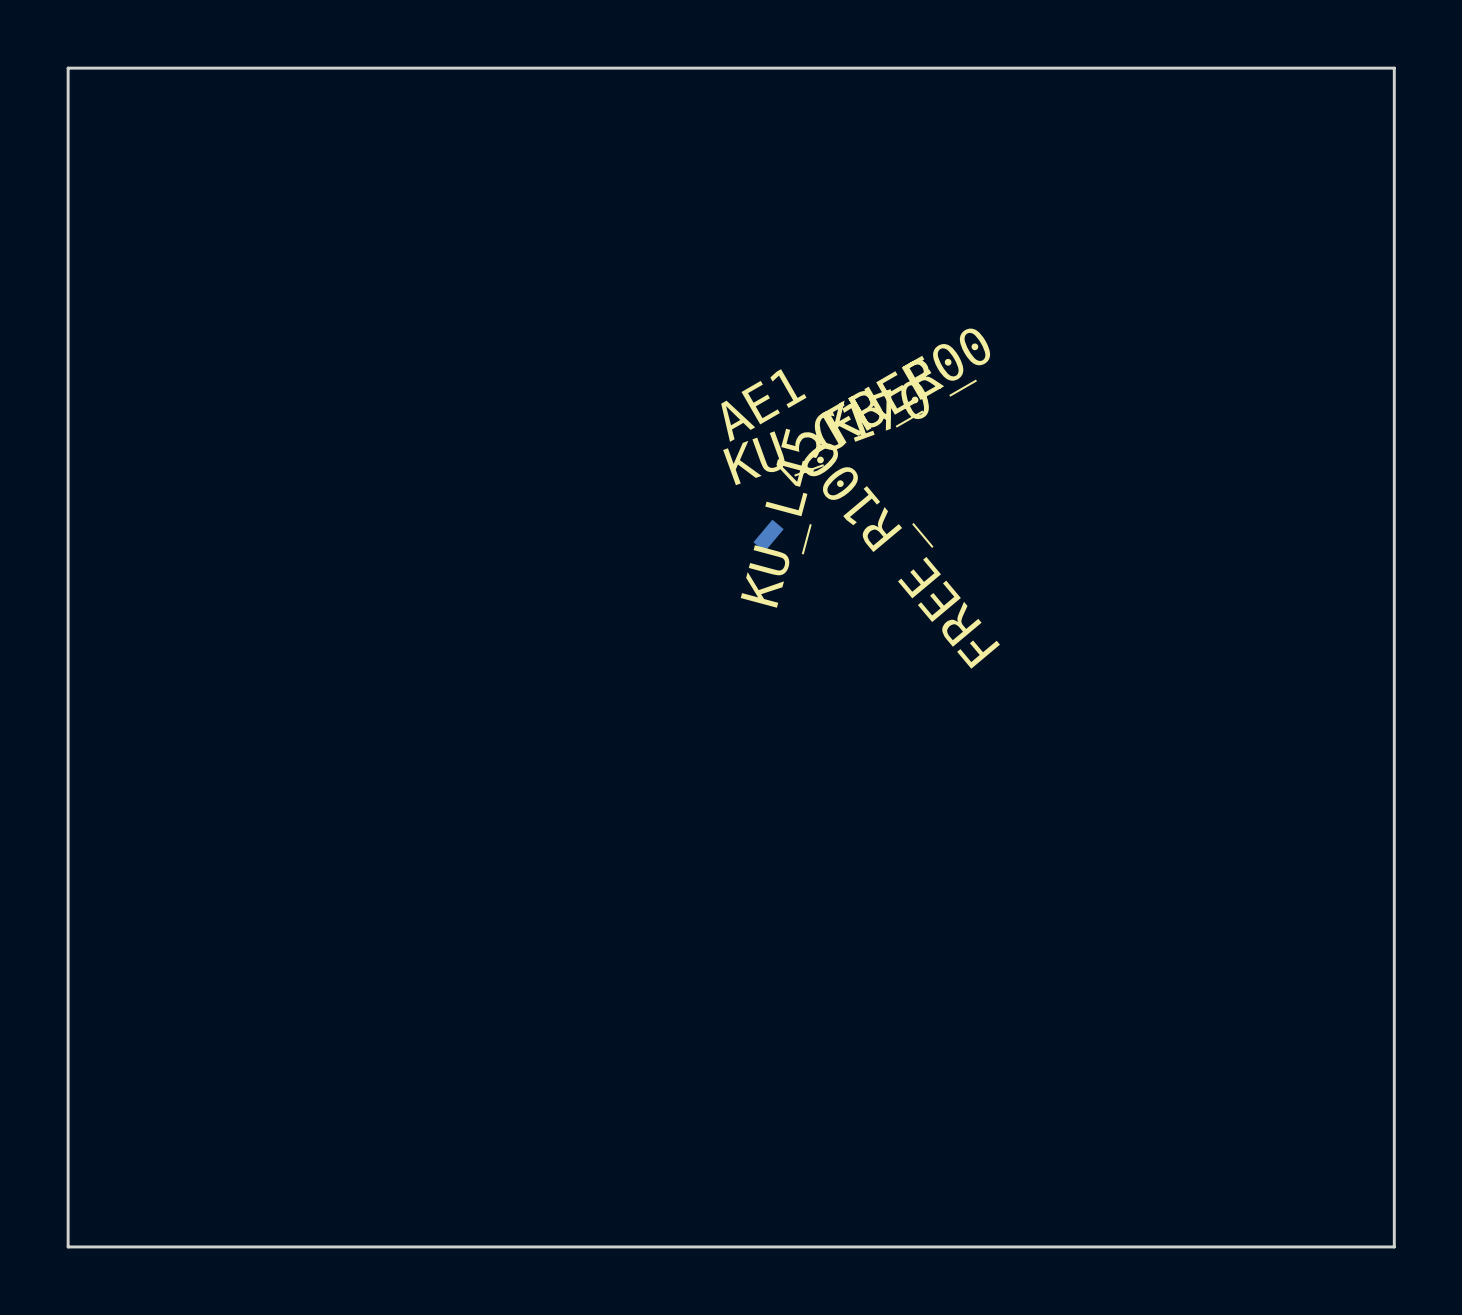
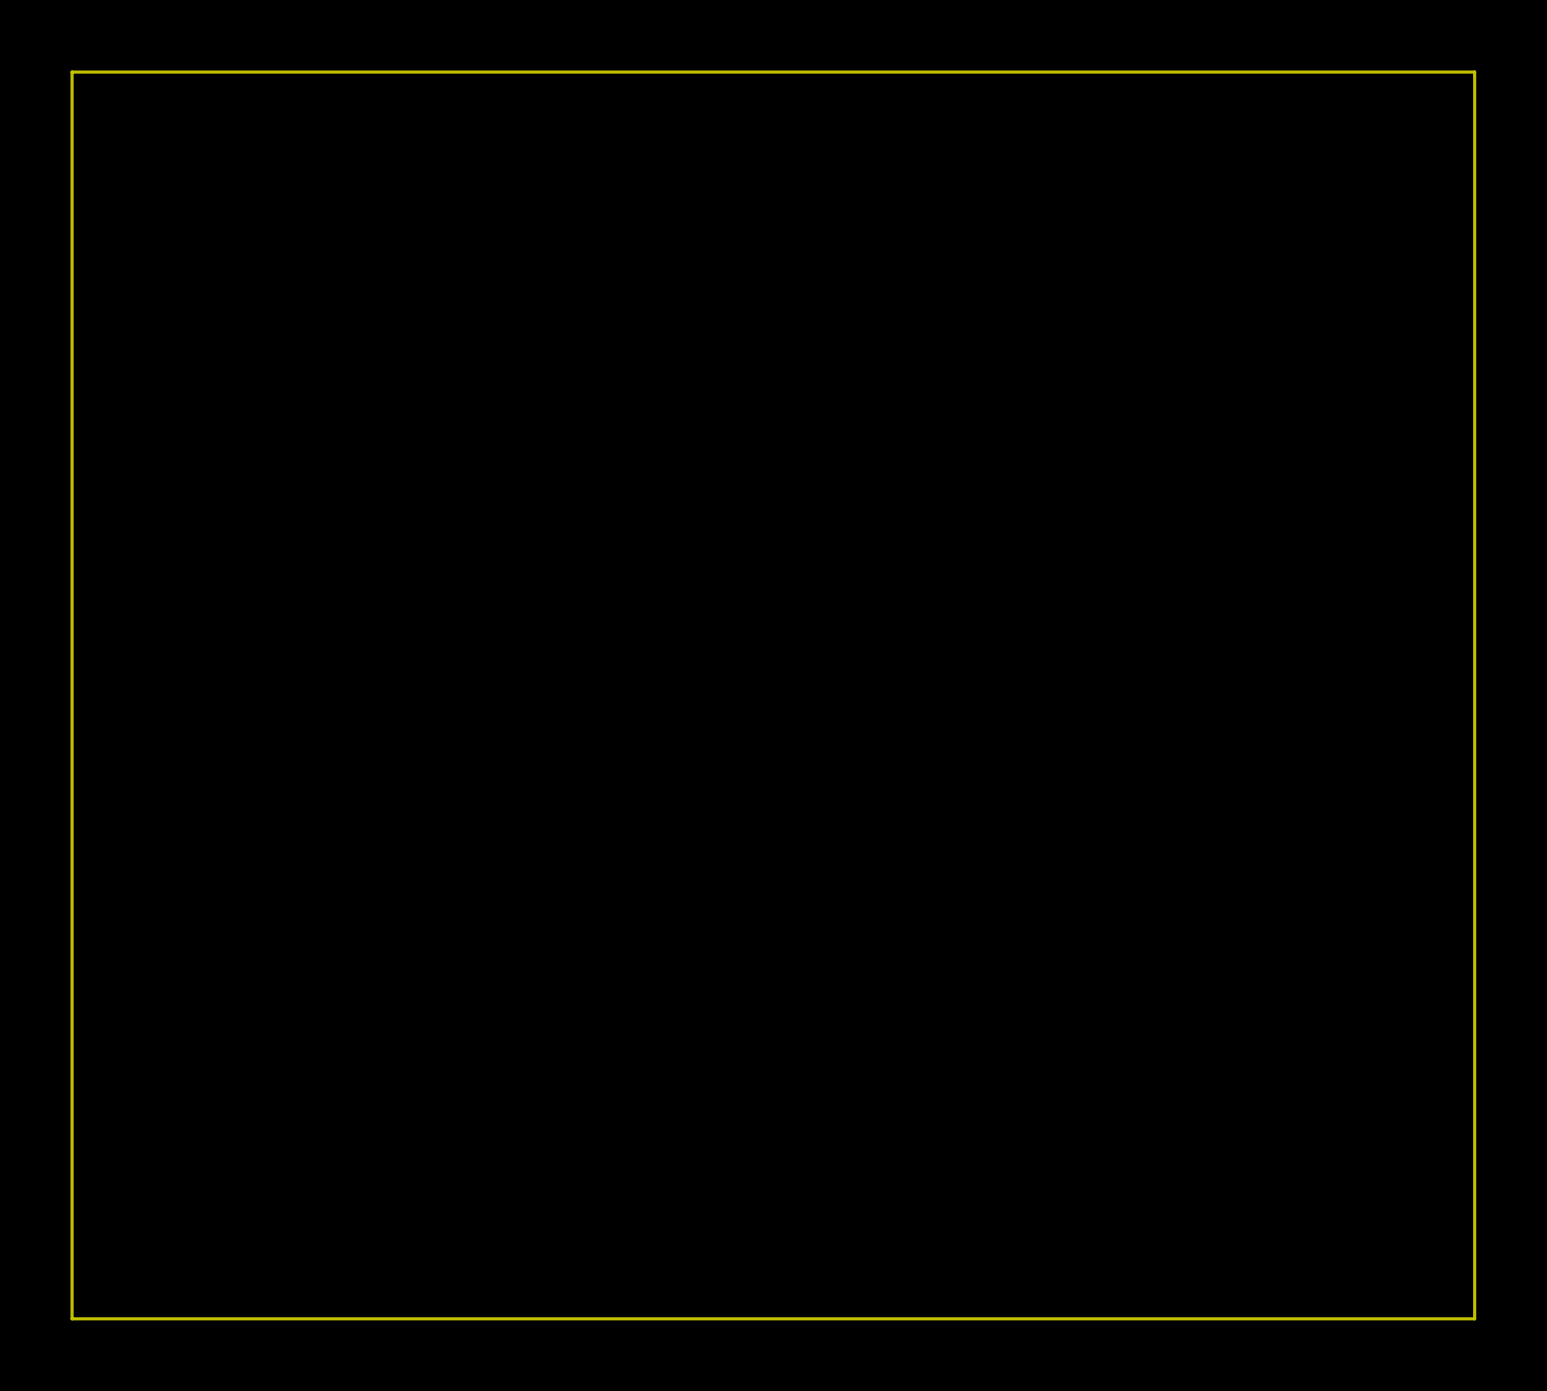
AE1: (768, 535) -> none

